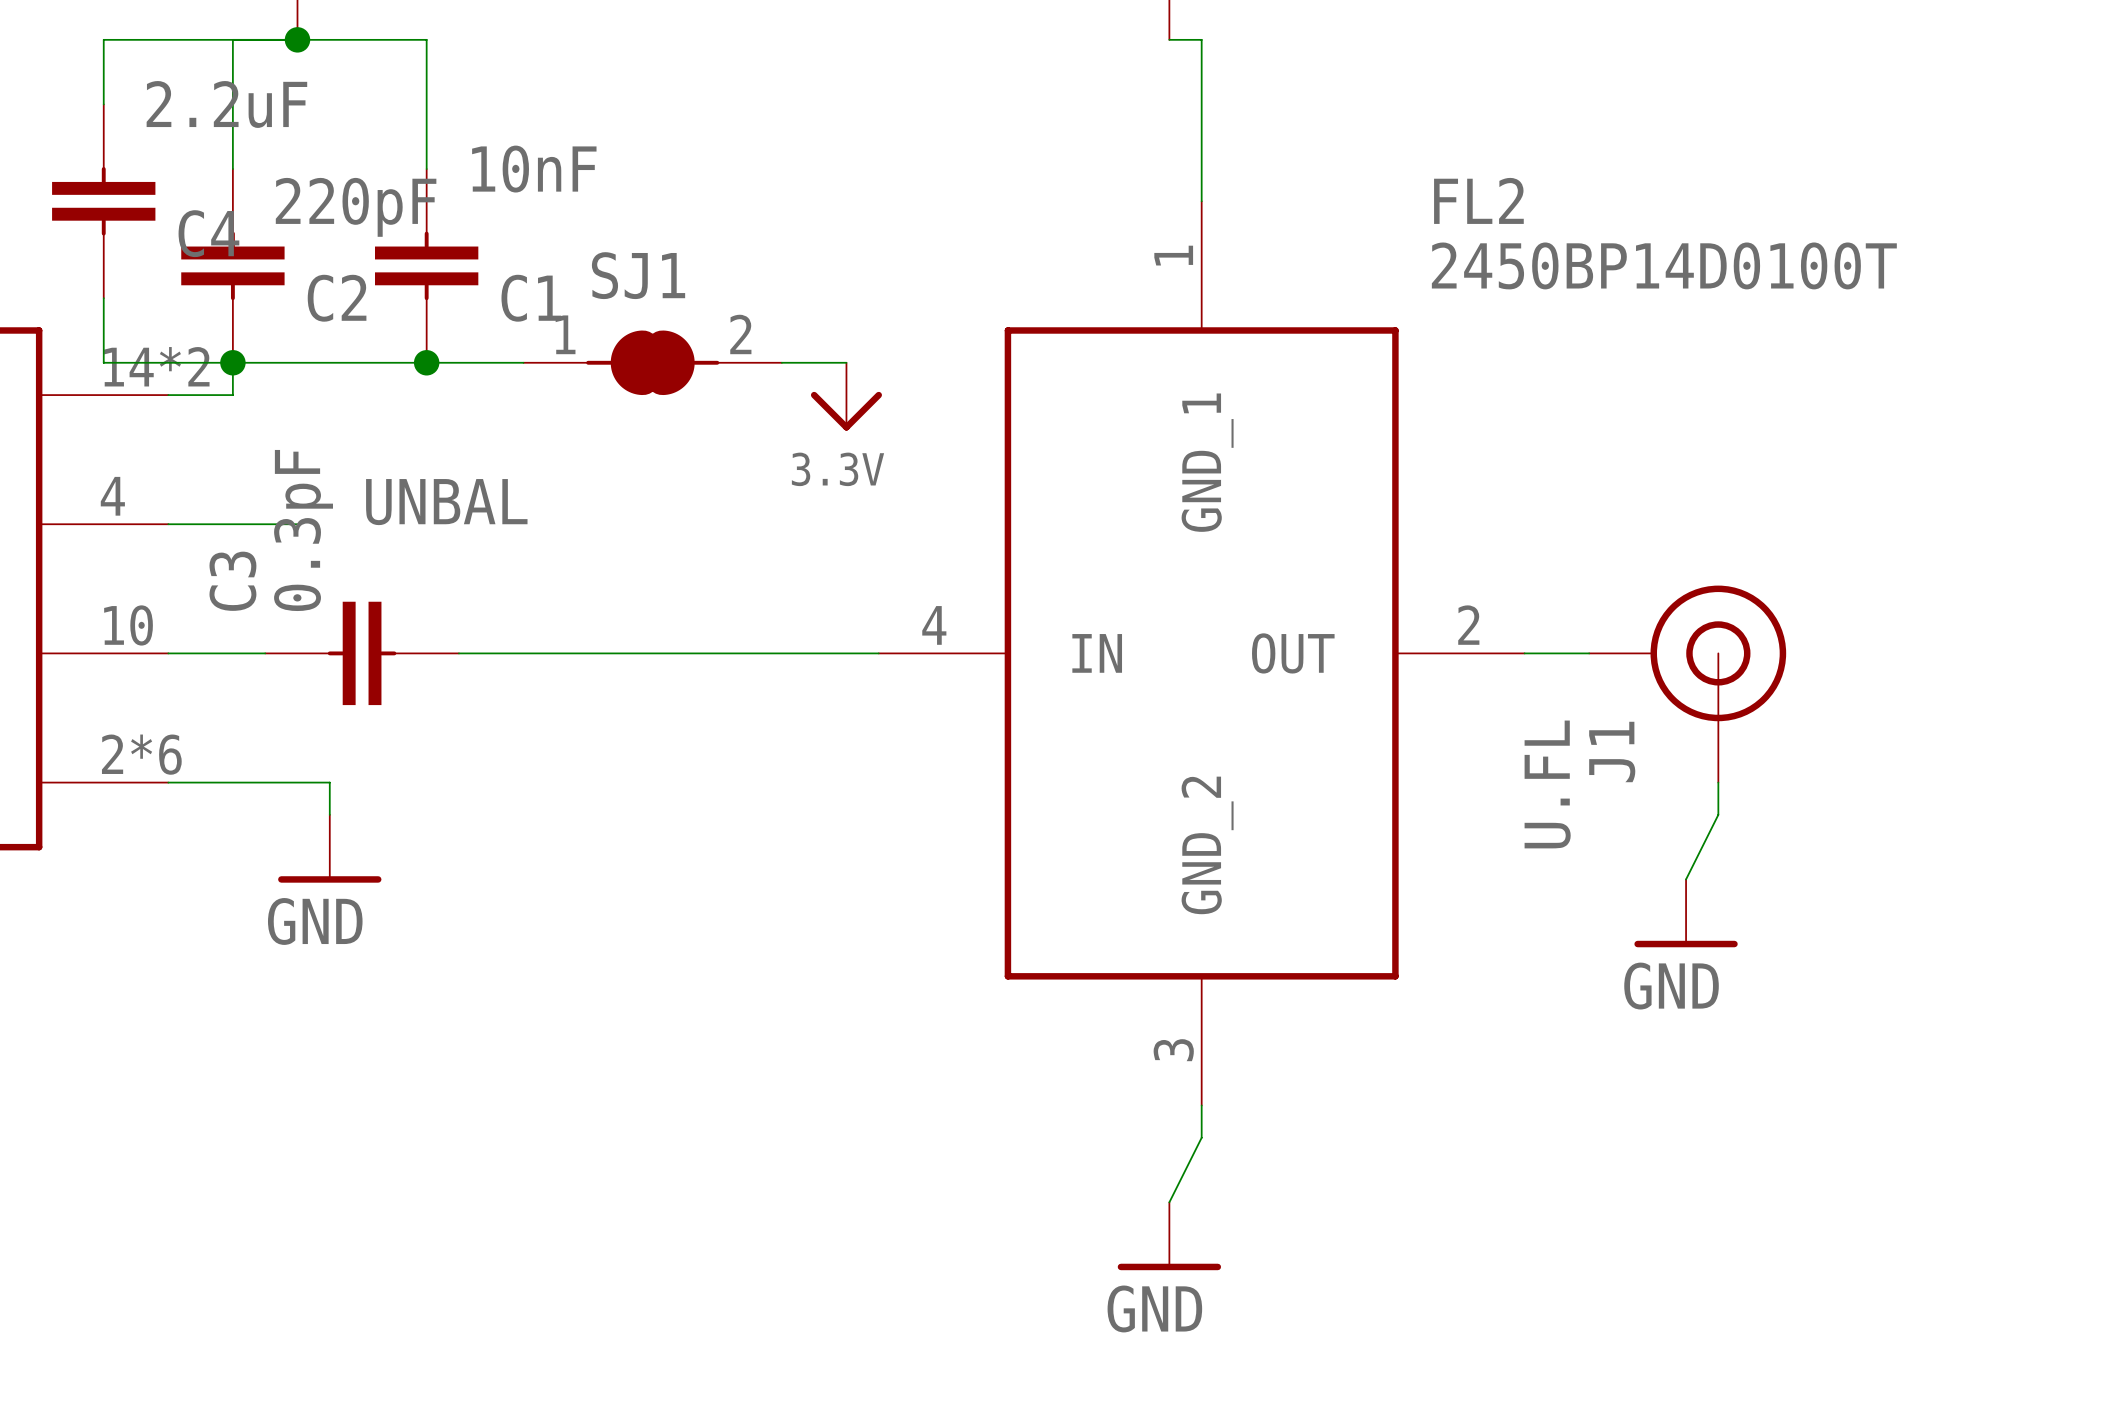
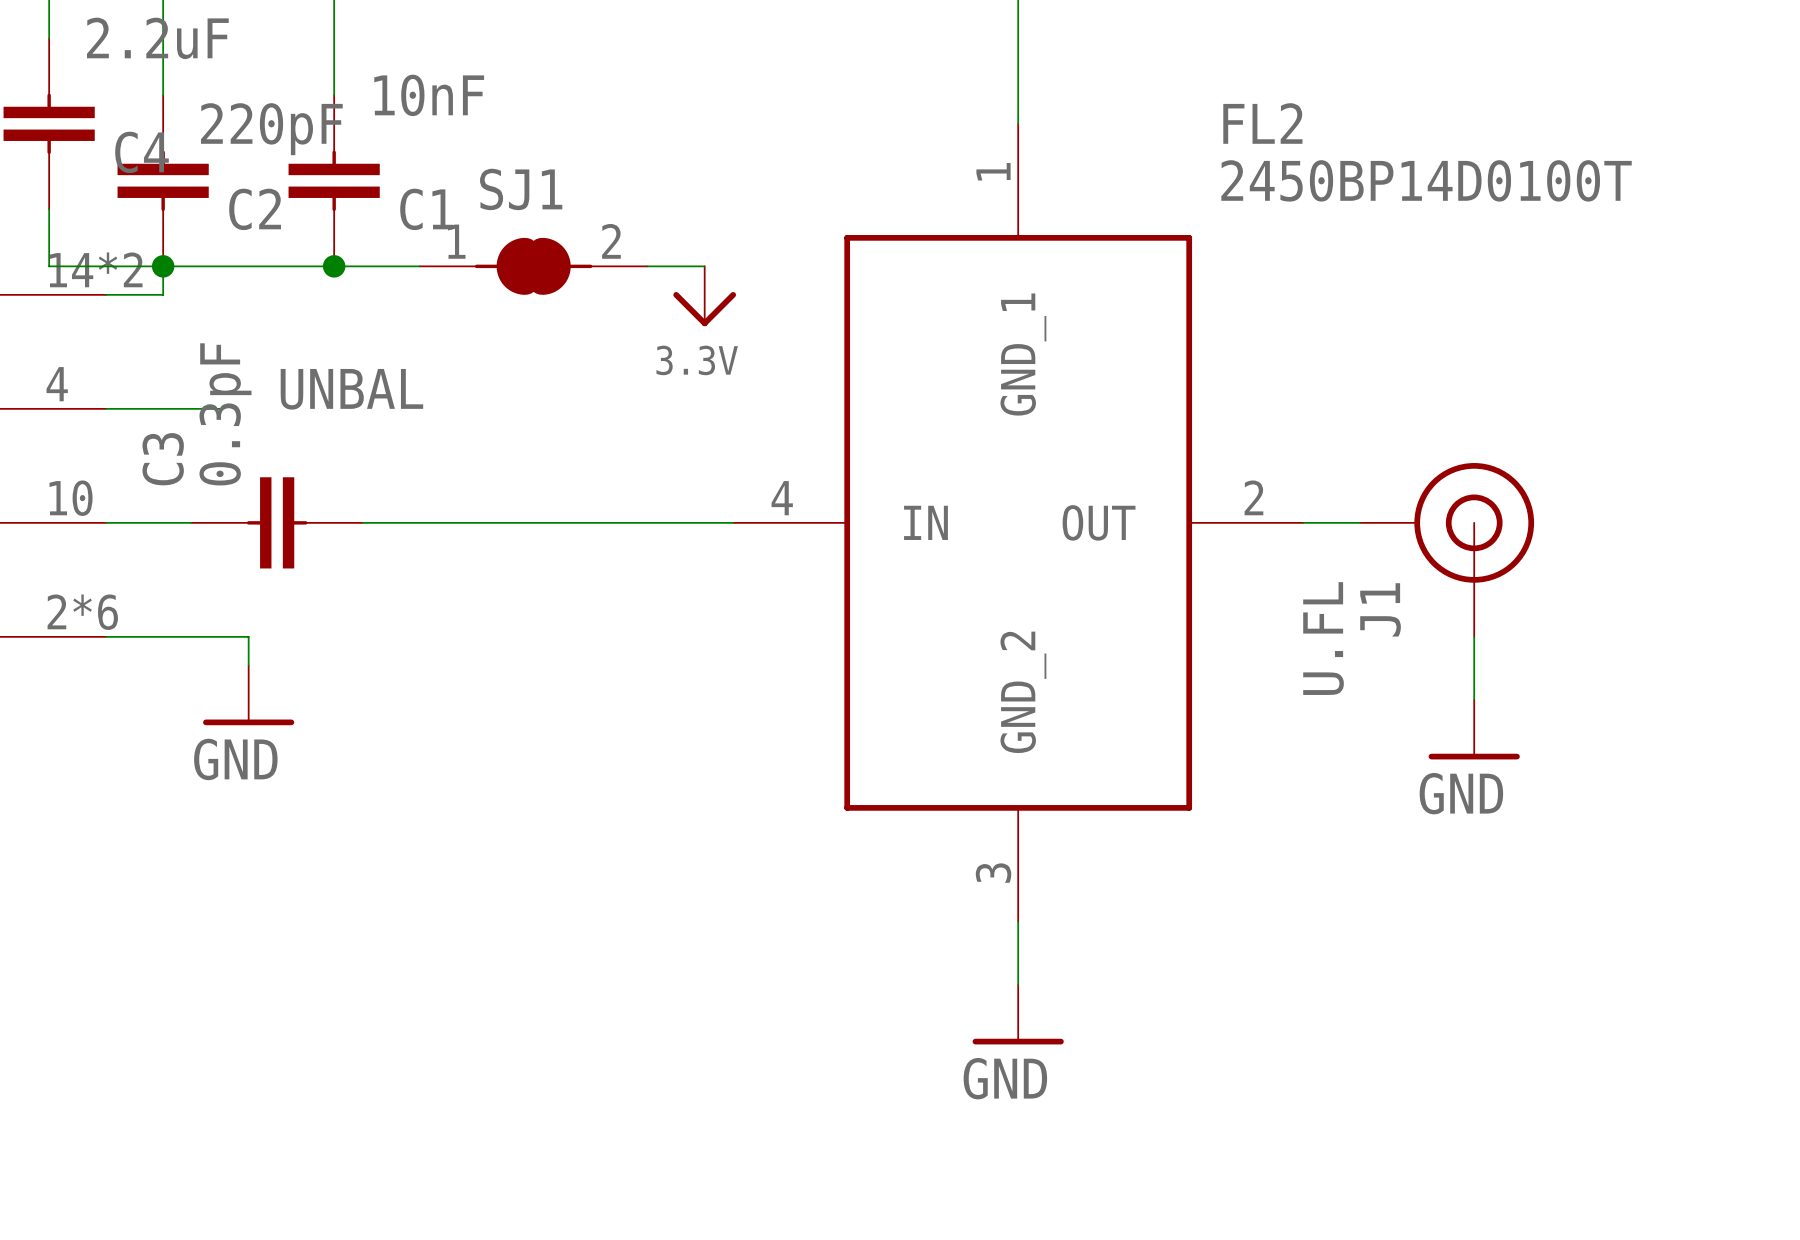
wire: (1718, 814) (1686, 879) -> (1474, 665) (1474, 699)
power symbol position: GND (1686, 913) -> GND (1474, 729)
wire: (1201, 1137) (1169, 1202) -> (1018, 950) (1018, 984)
power symbol position: GND (1169, 1236) -> GND (1018, 1014)

